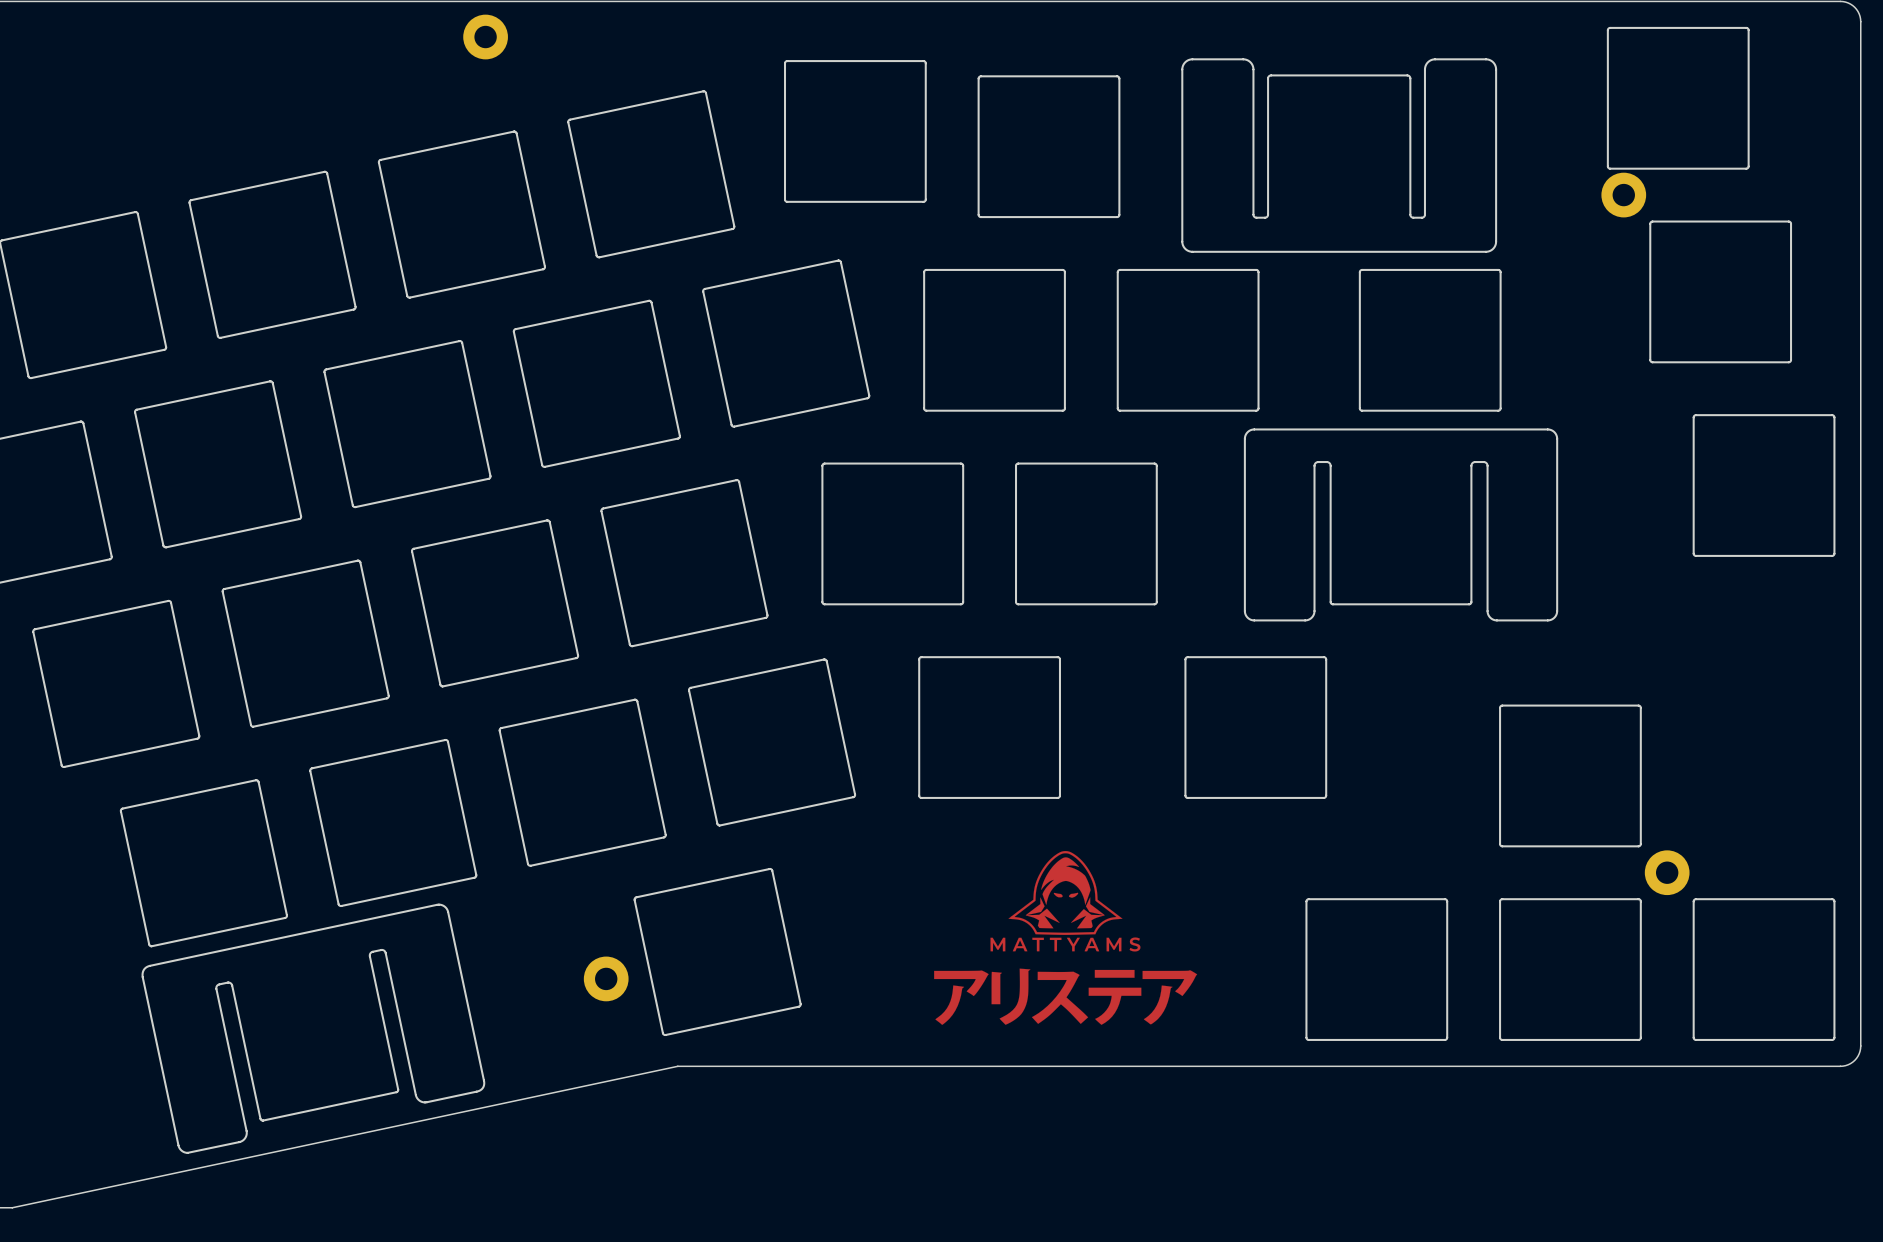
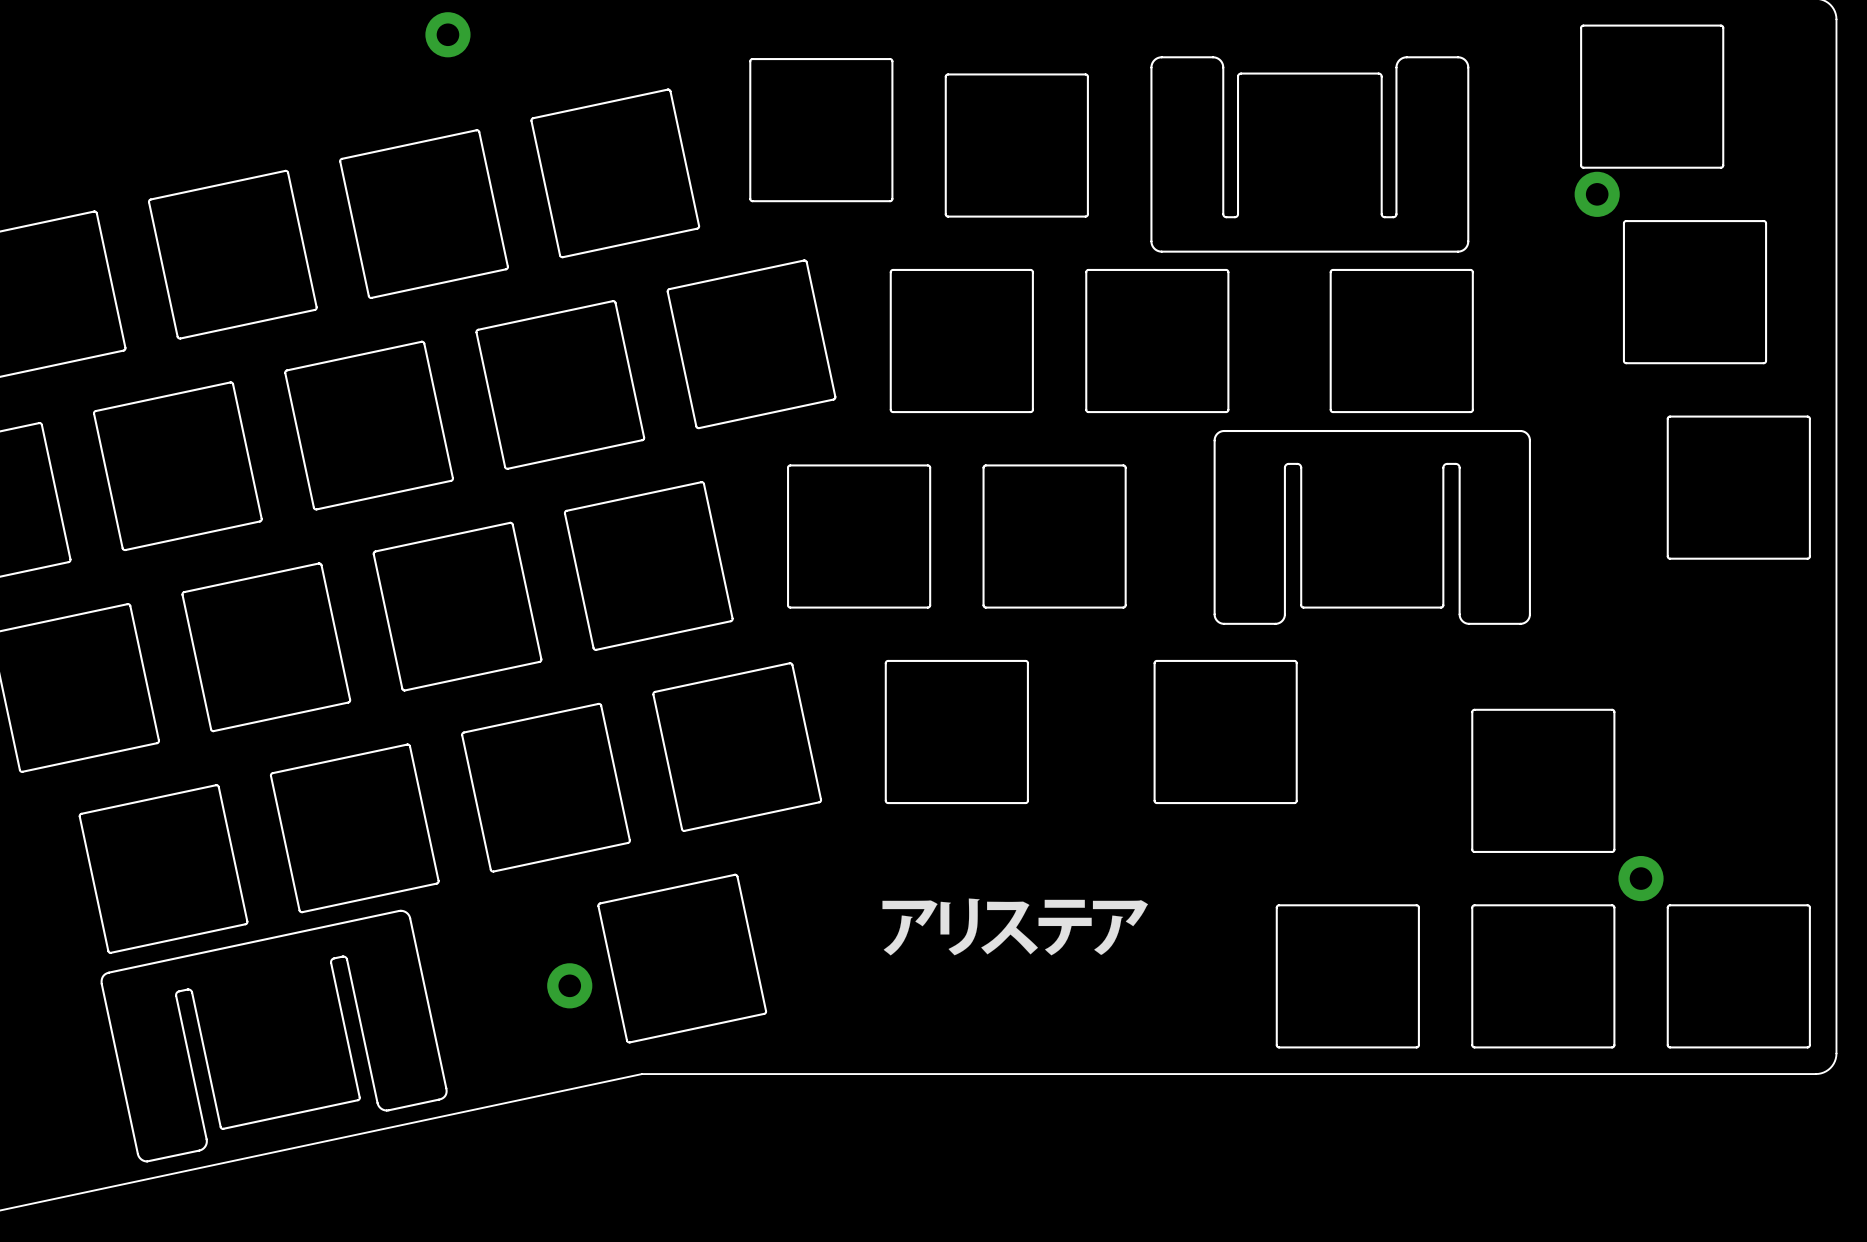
drawing: [990, 851, 1141, 952] -> none
drawing: none -> [882, 898, 1149, 956]
drawing: [934, 968, 1198, 1025] -> none

